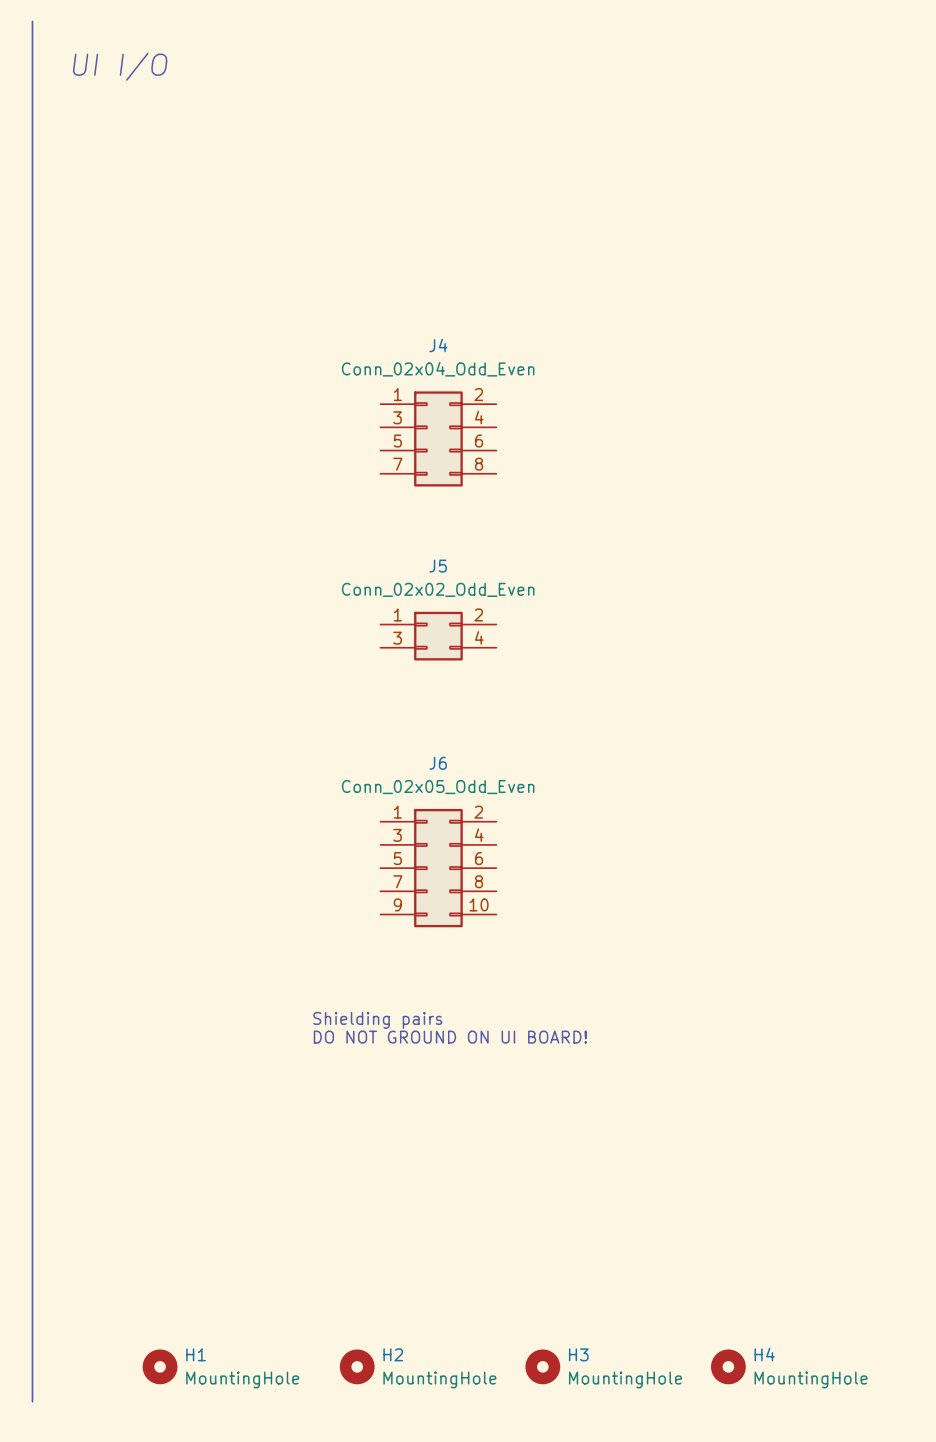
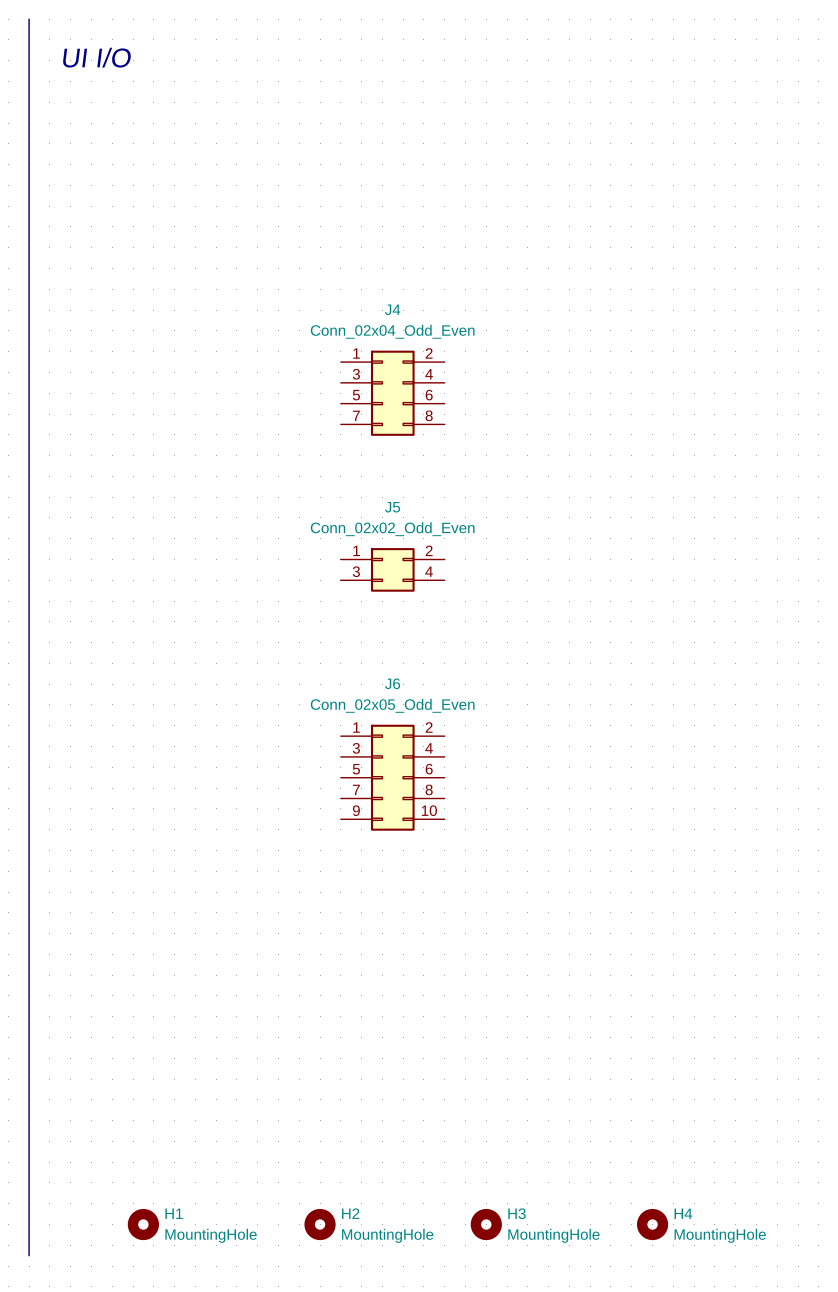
text: Shielding pairs (377, 1020) -> none
text: DO NOT GROUND ON UI BOARD! (450, 1037) -> none

